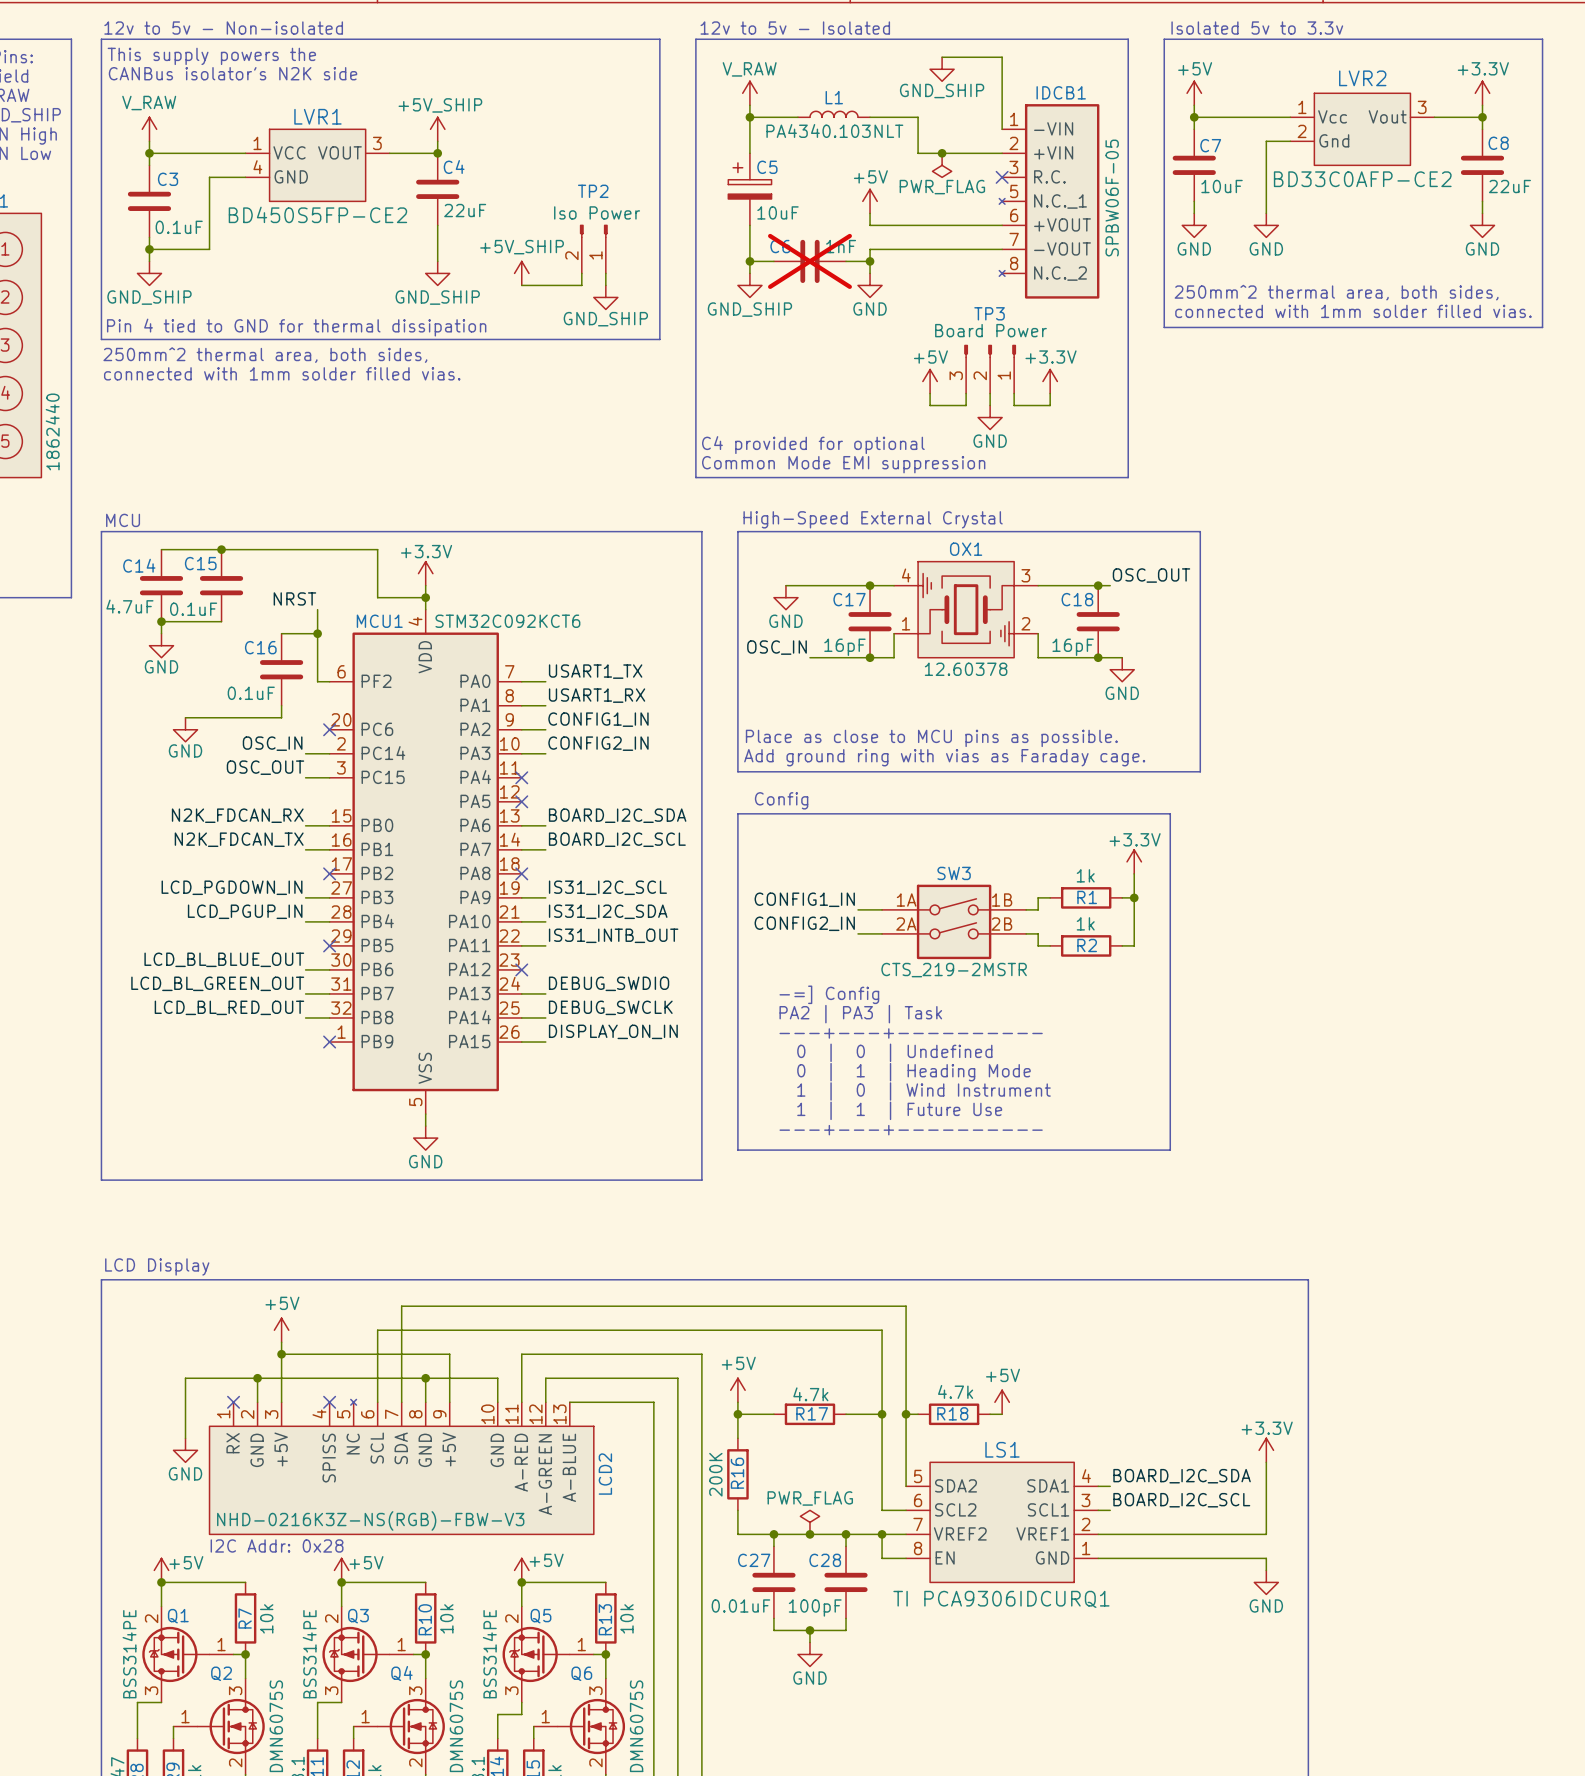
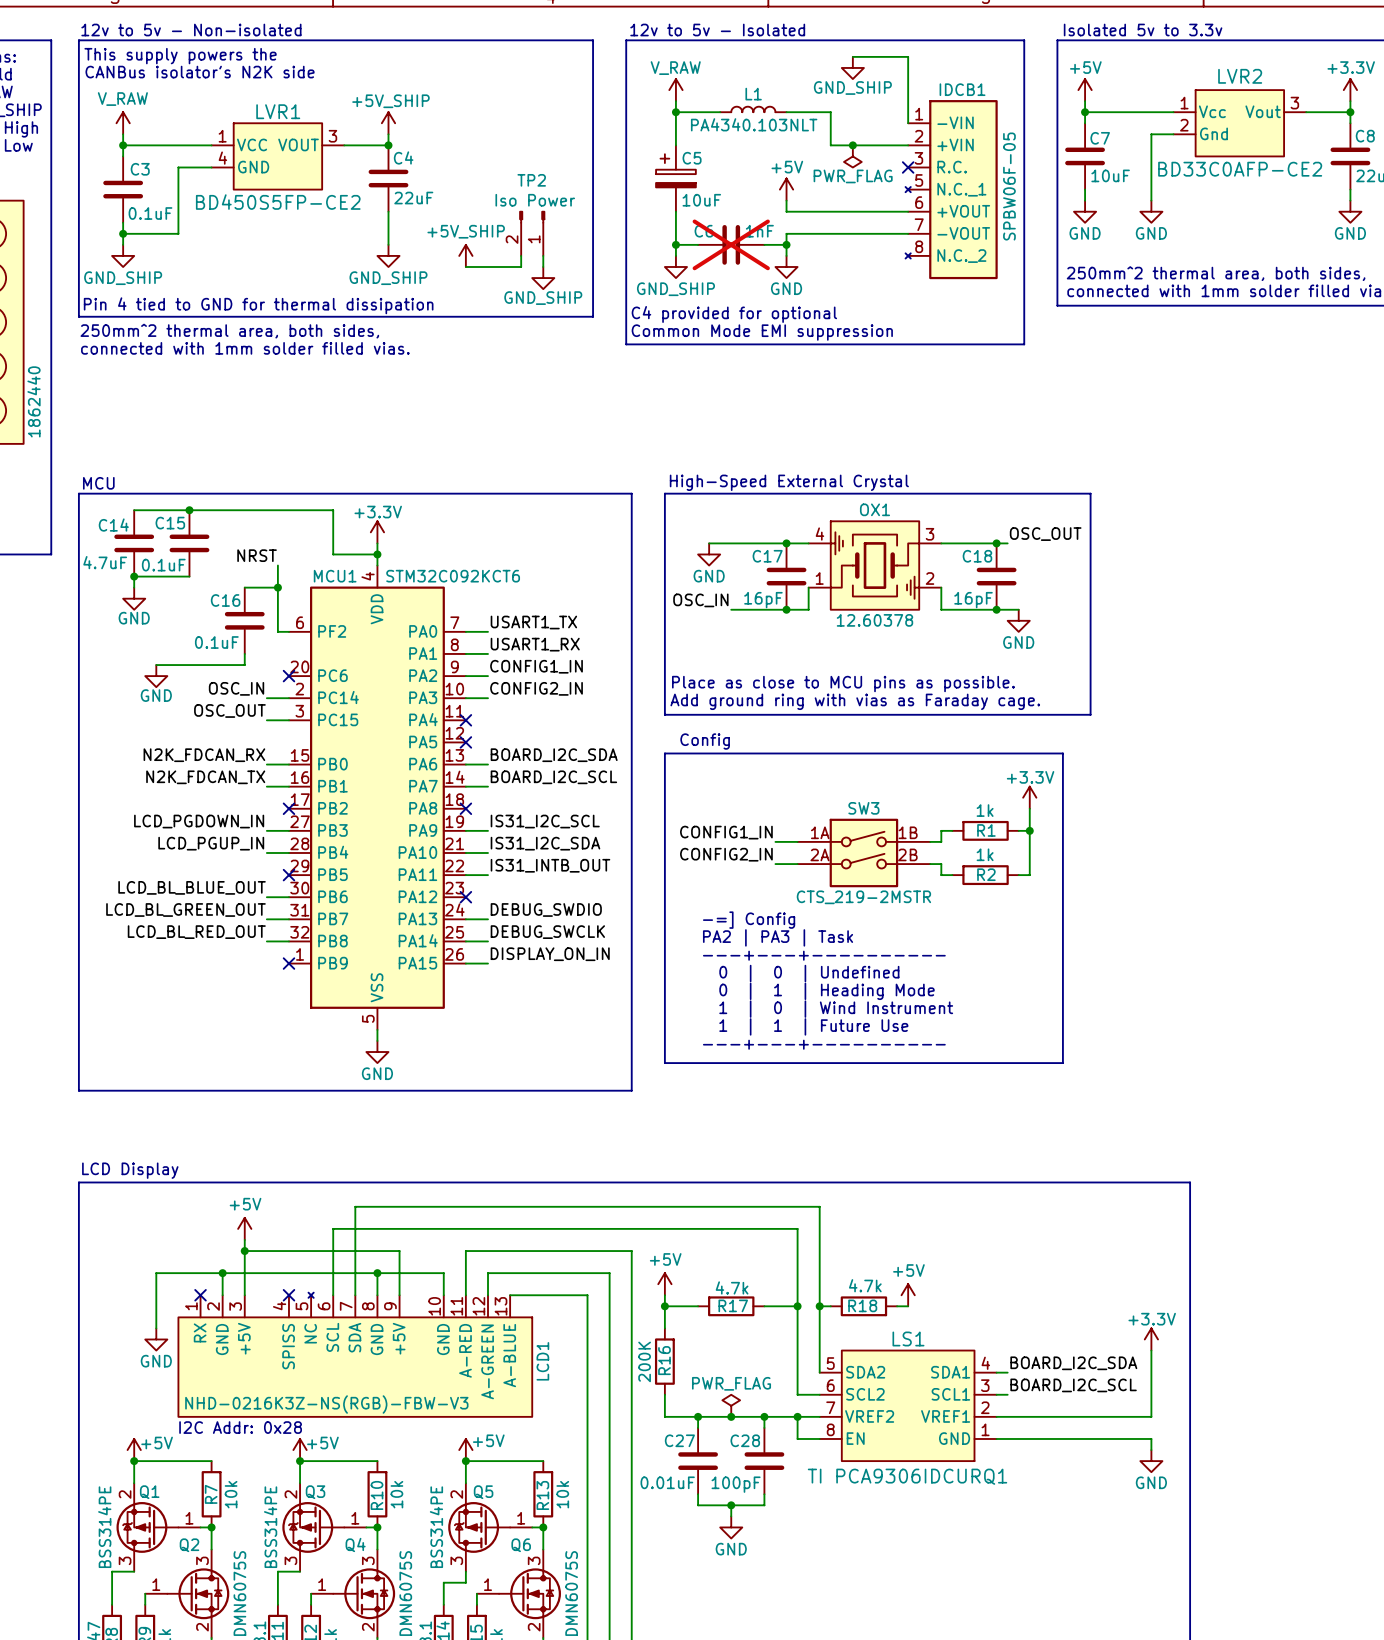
line: (695, 369) (695, 477) (1128, 477) (1128, 369) -> (626, 344) (1024, 344)
TP3: Board Power (990, 369) -> none
power symbol: +5V (930, 381) -> none
power symbol: +3.3V (1050, 381) -> none
wire: (930, 393) (930, 405) (966, 405) (966, 393) -> none
wire: (990, 393) (990, 405) -> none
wire: (1014, 393) (1014, 405) (1050, 405) (1050, 393) -> none
power symbol: GND (990, 417) -> none
text position: C4 provided for optional (813, 445) -> C4 provided for optional (734, 314)
text position: Common Mode EMI suppression (843, 464) -> Common Mode EMI suppression (762, 332)
LCD2 name: LCD2 (605, 1474) -> LCD1 (542, 1361)

